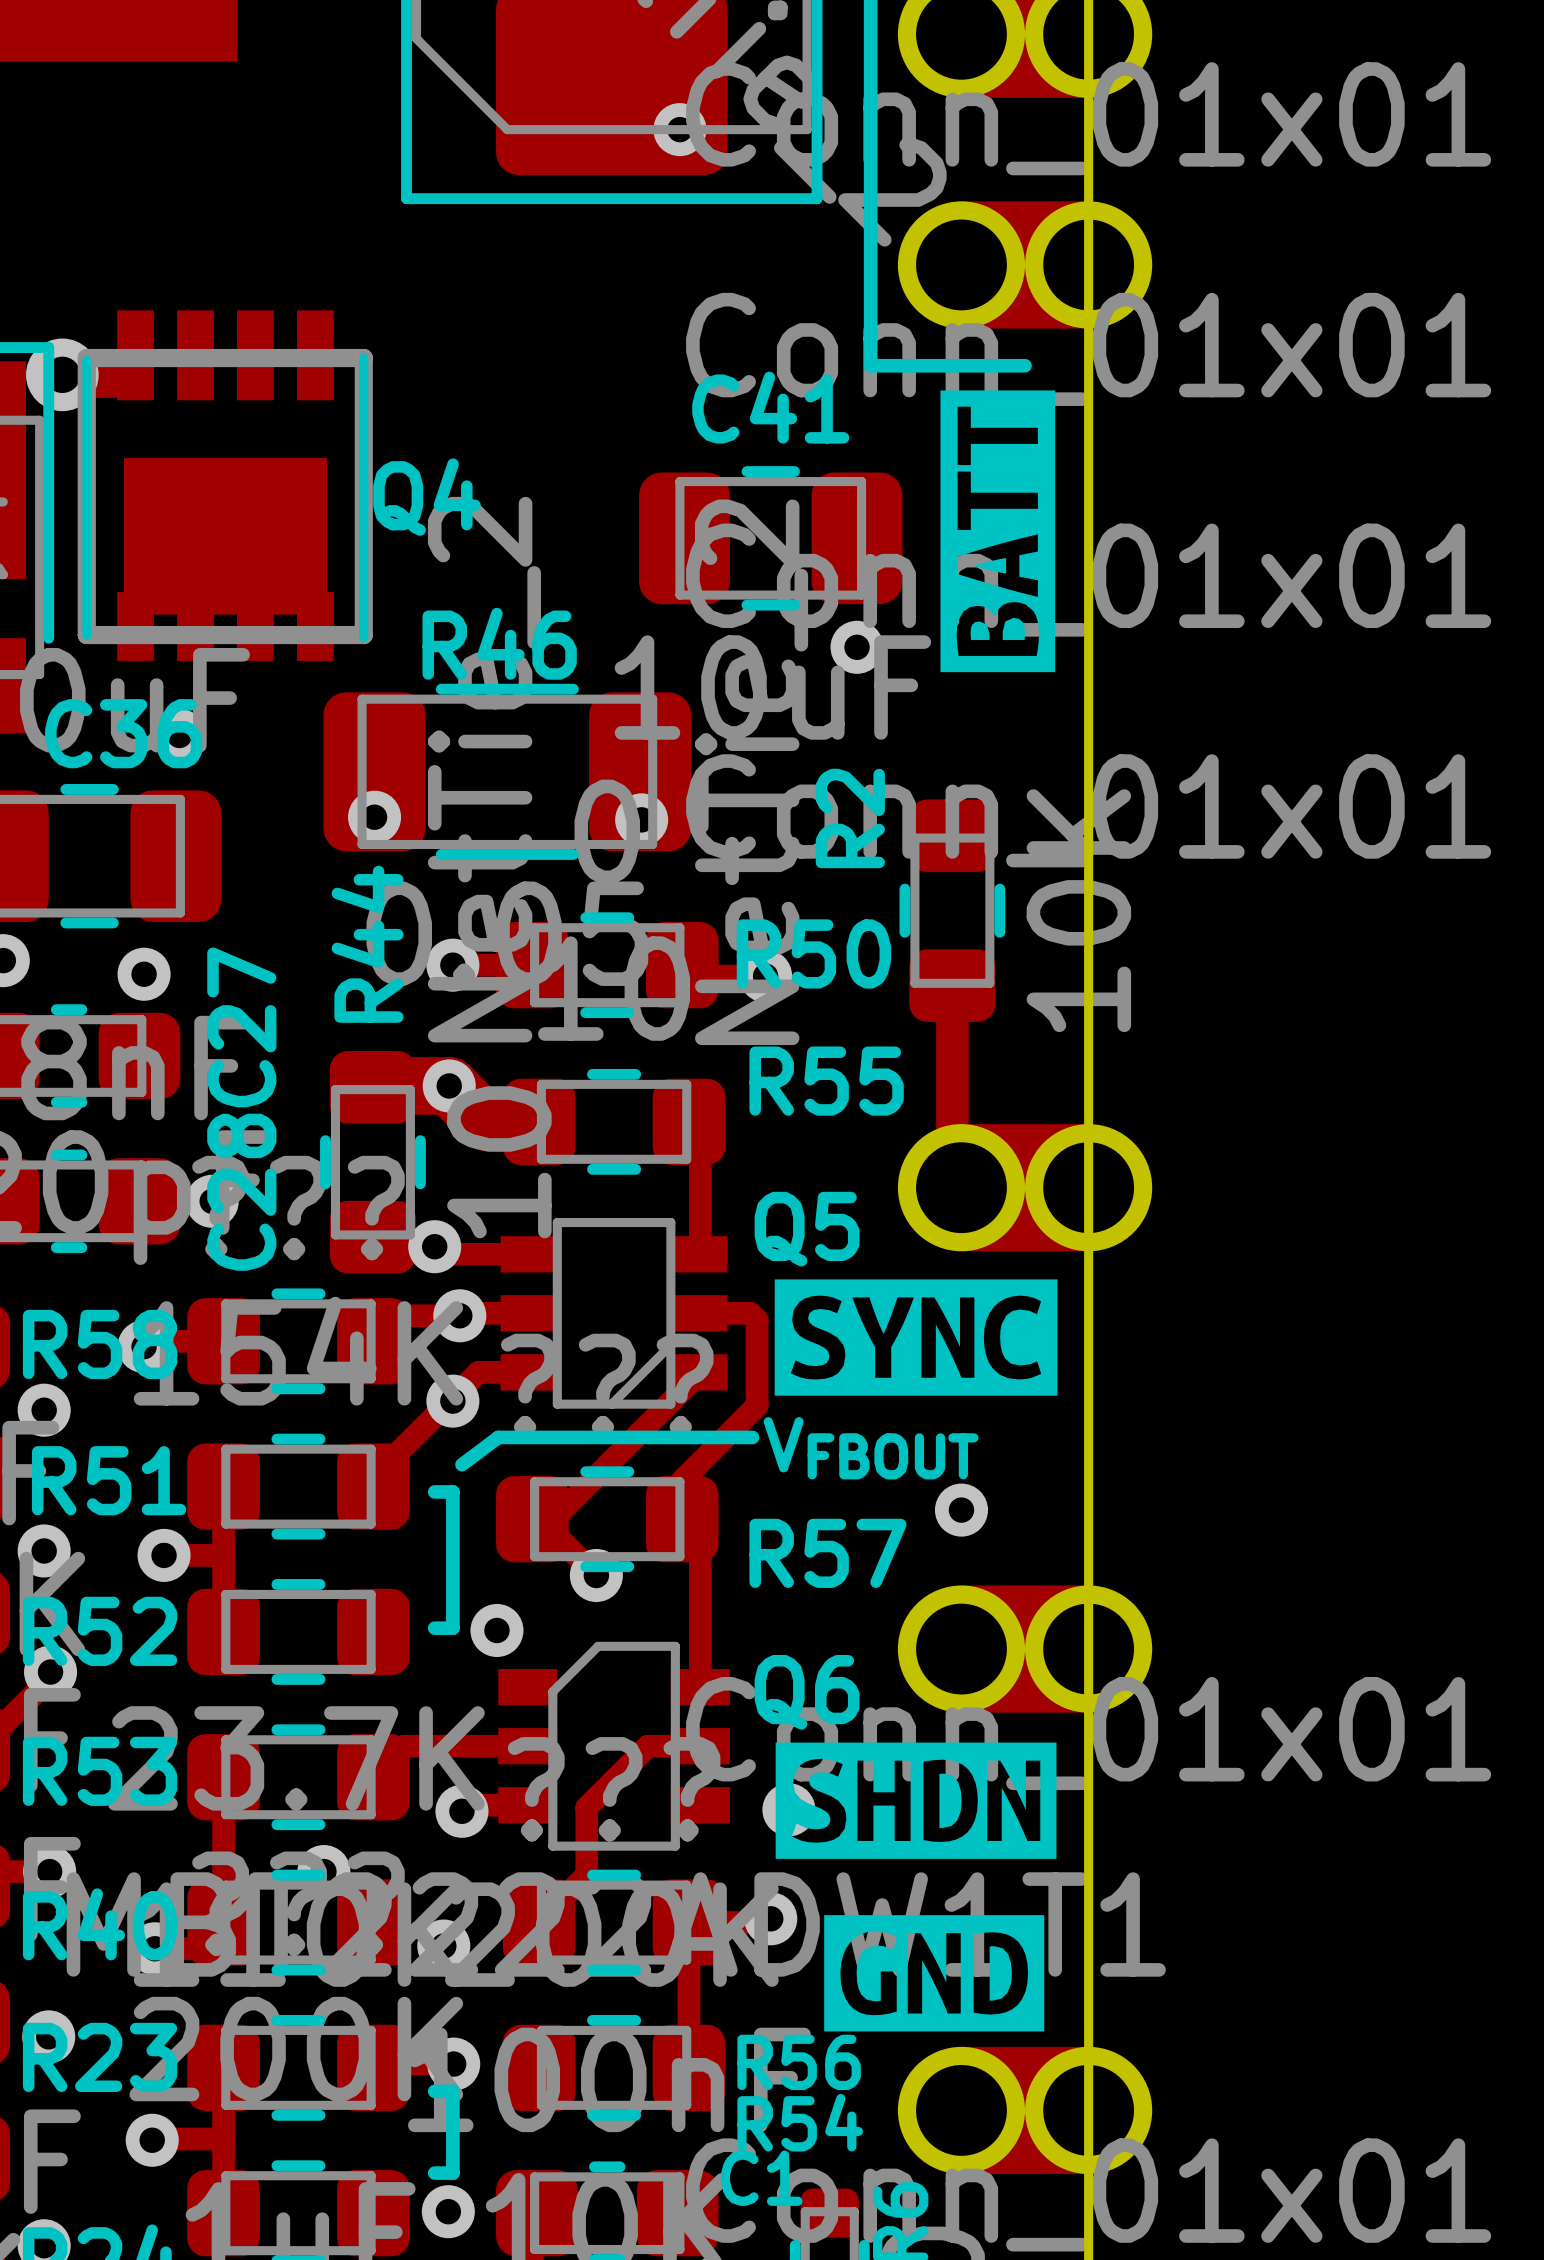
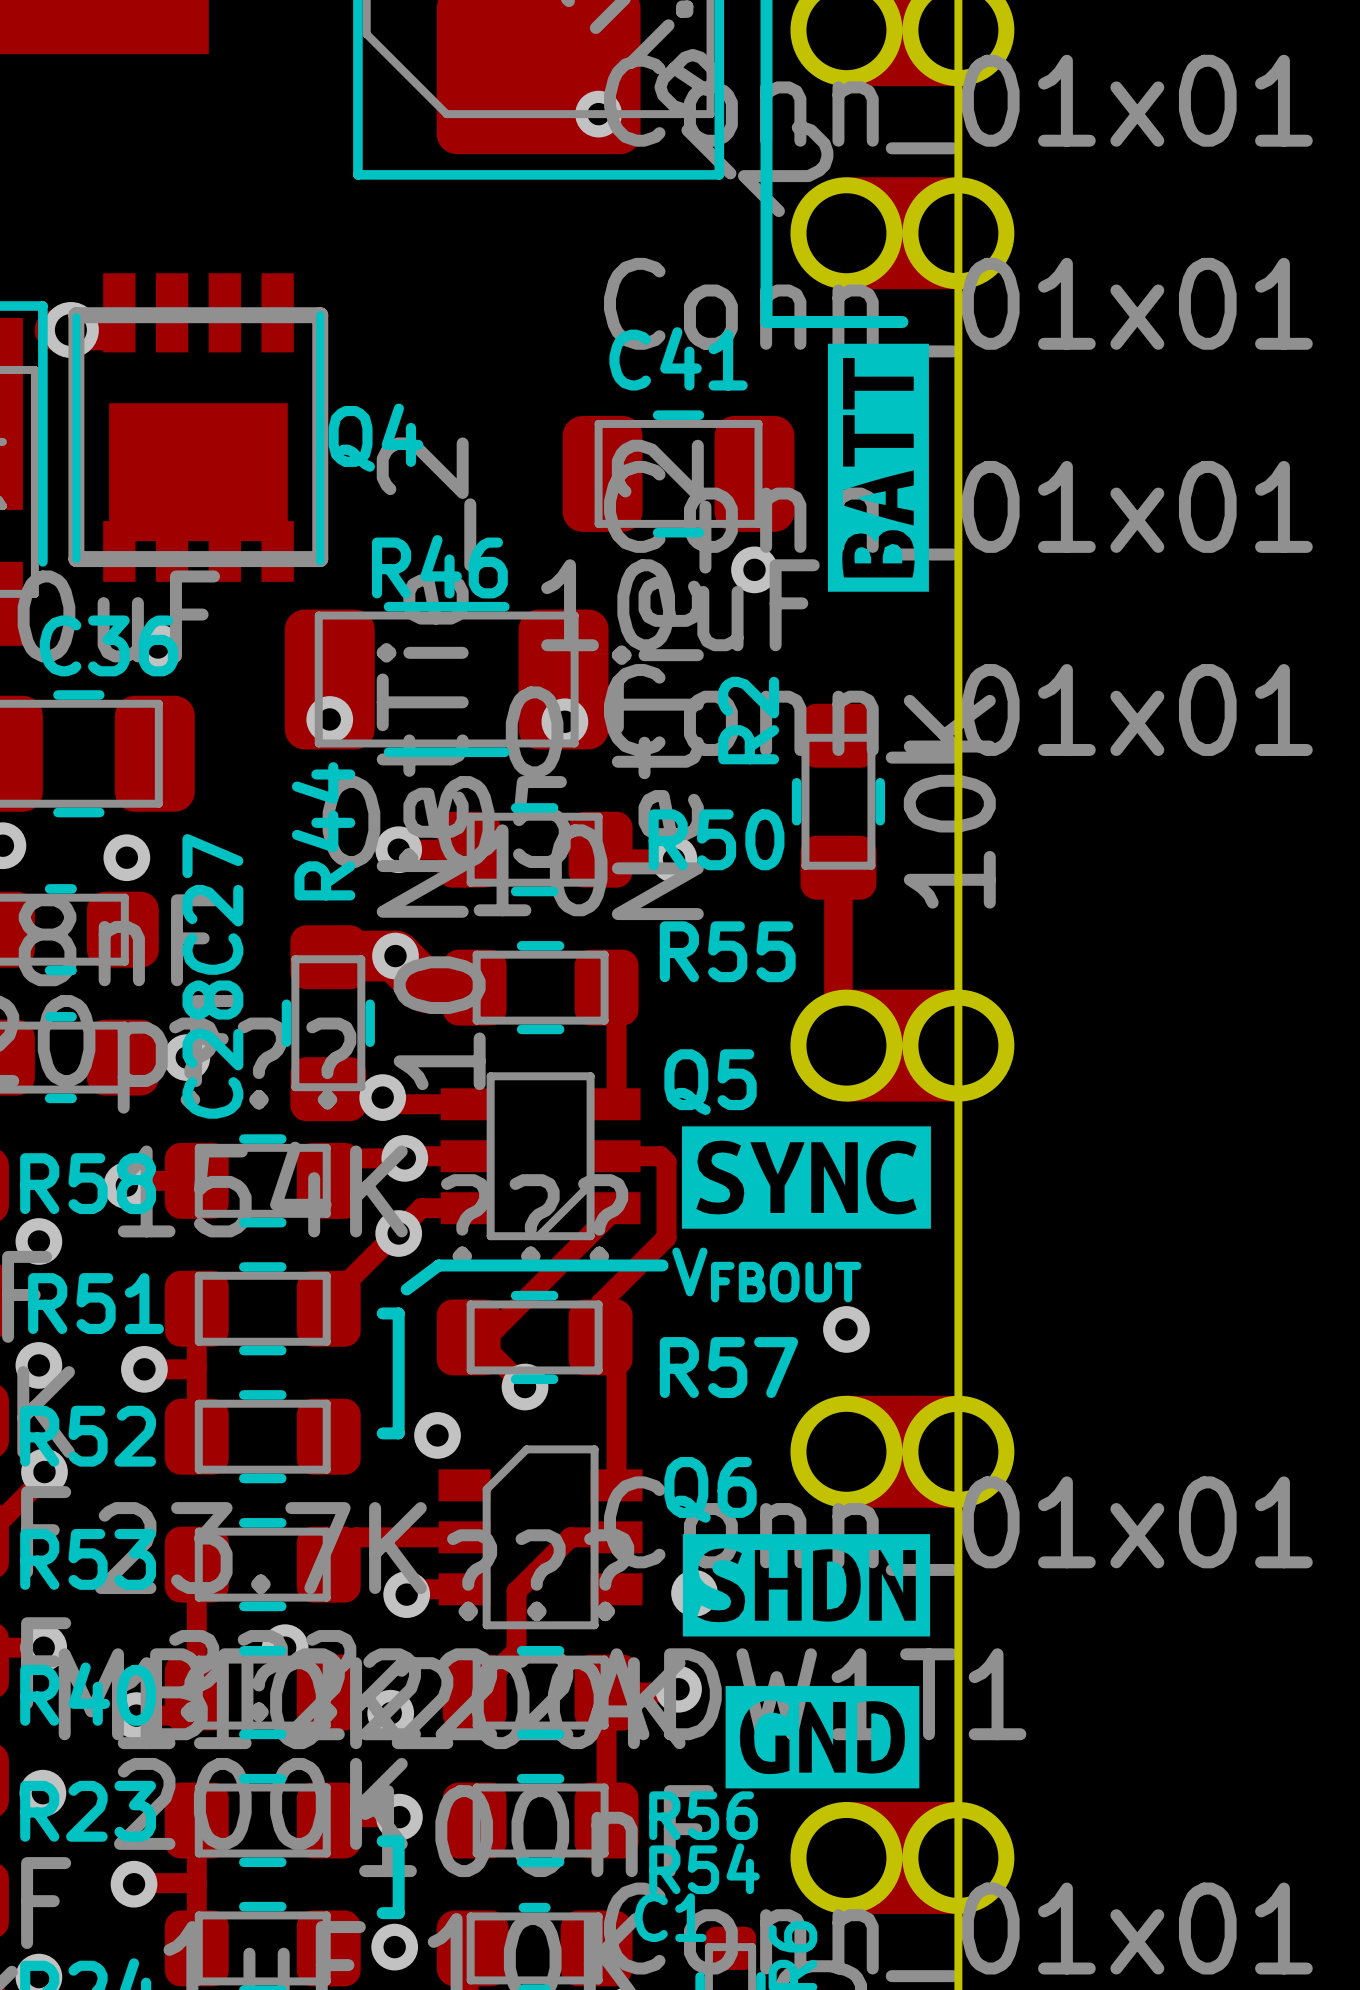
via size: [26, 338, 99, 412] -> [42, 302, 99, 358]

